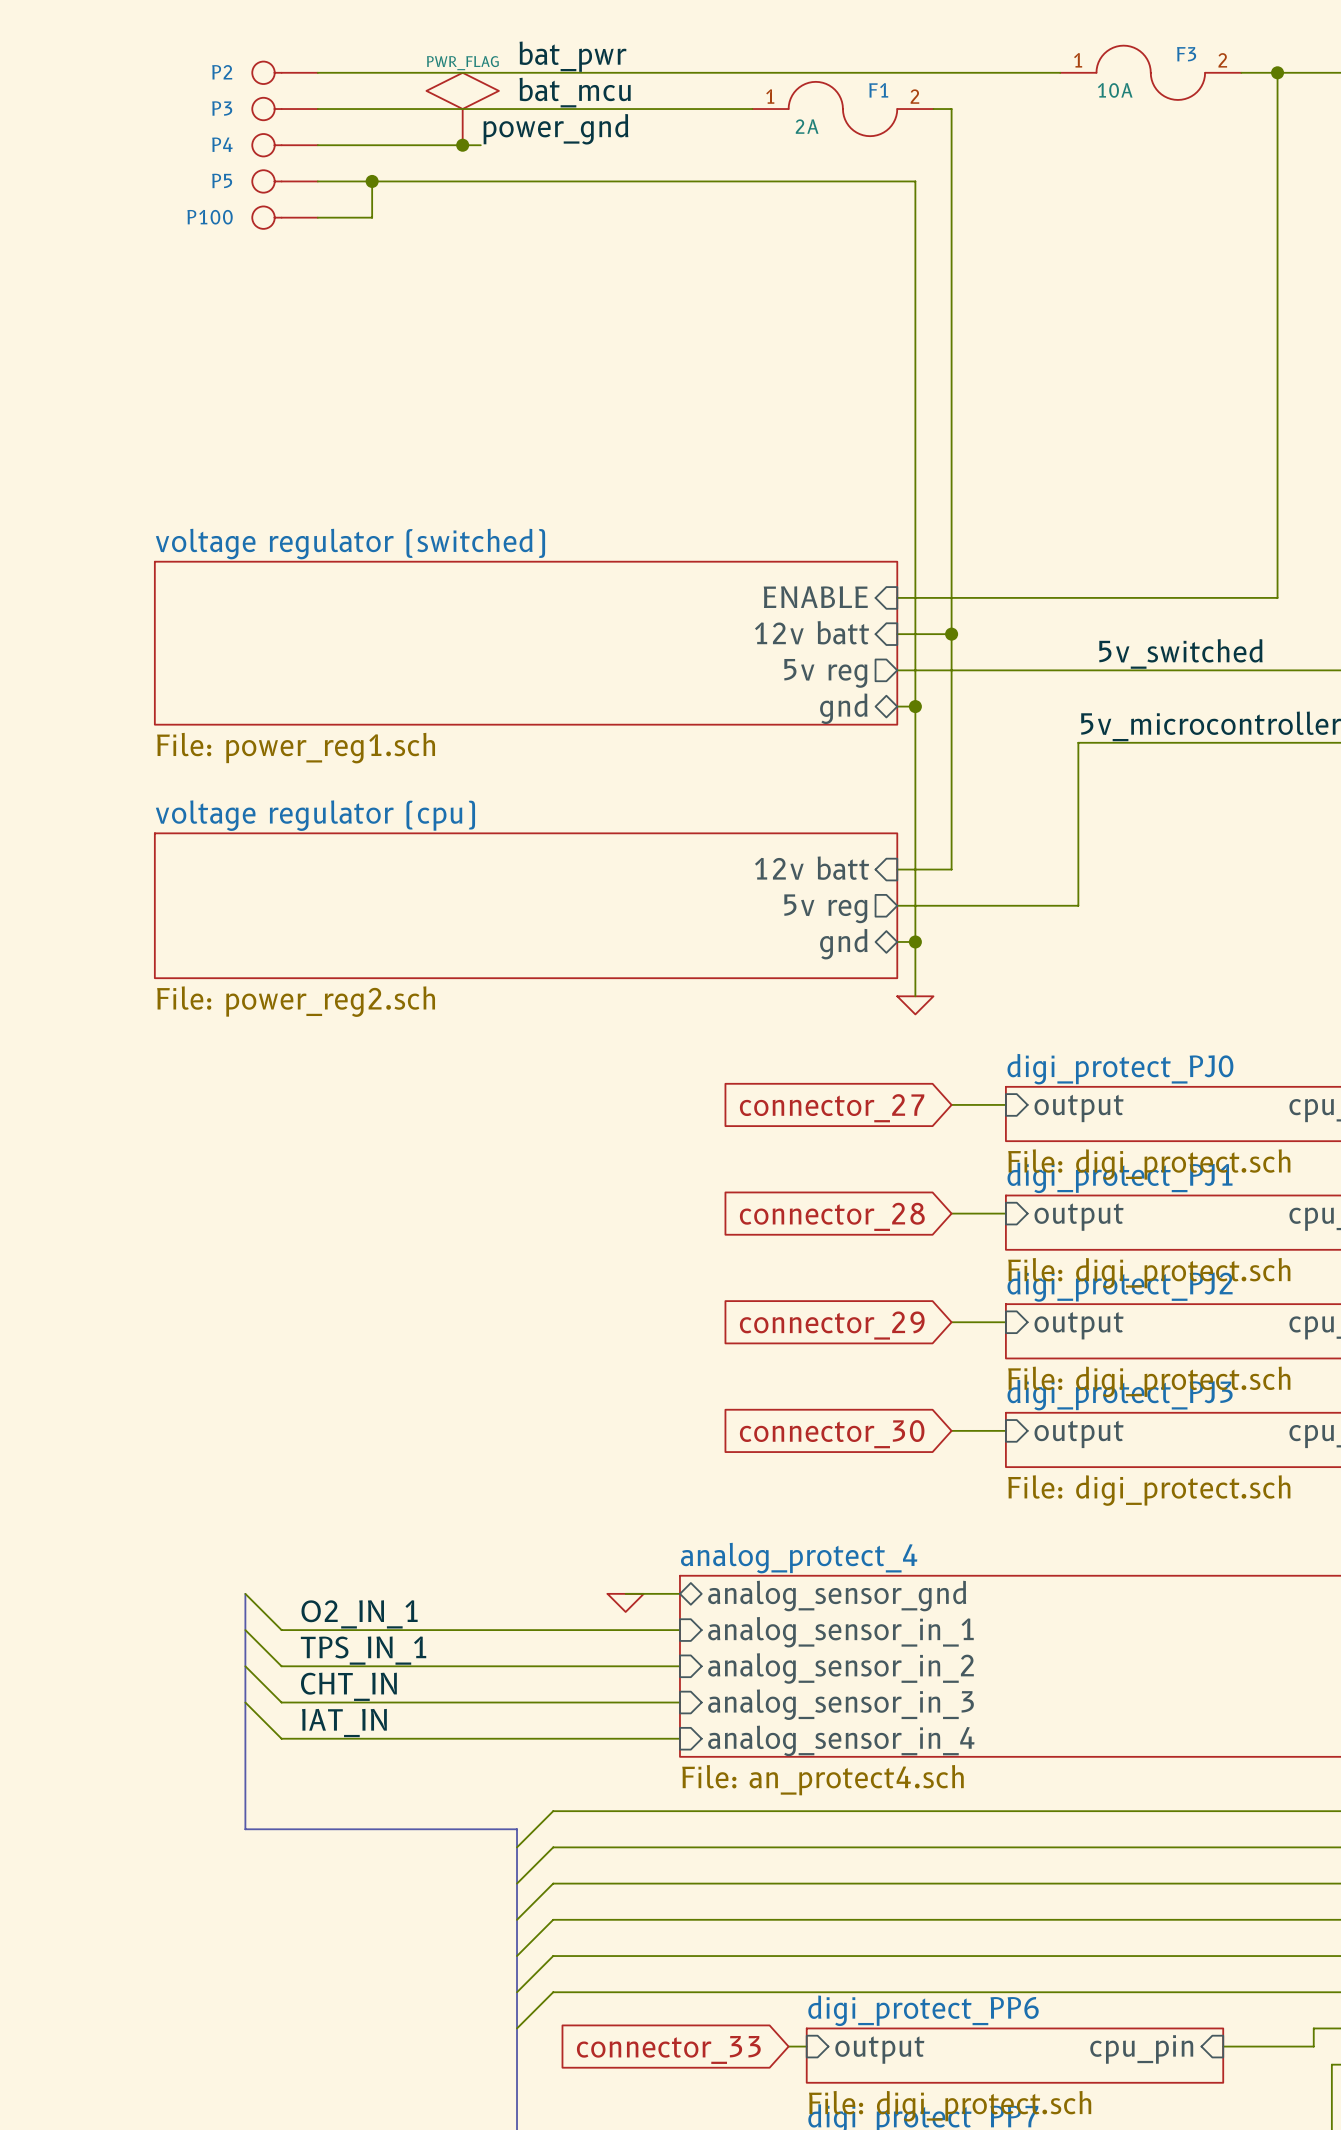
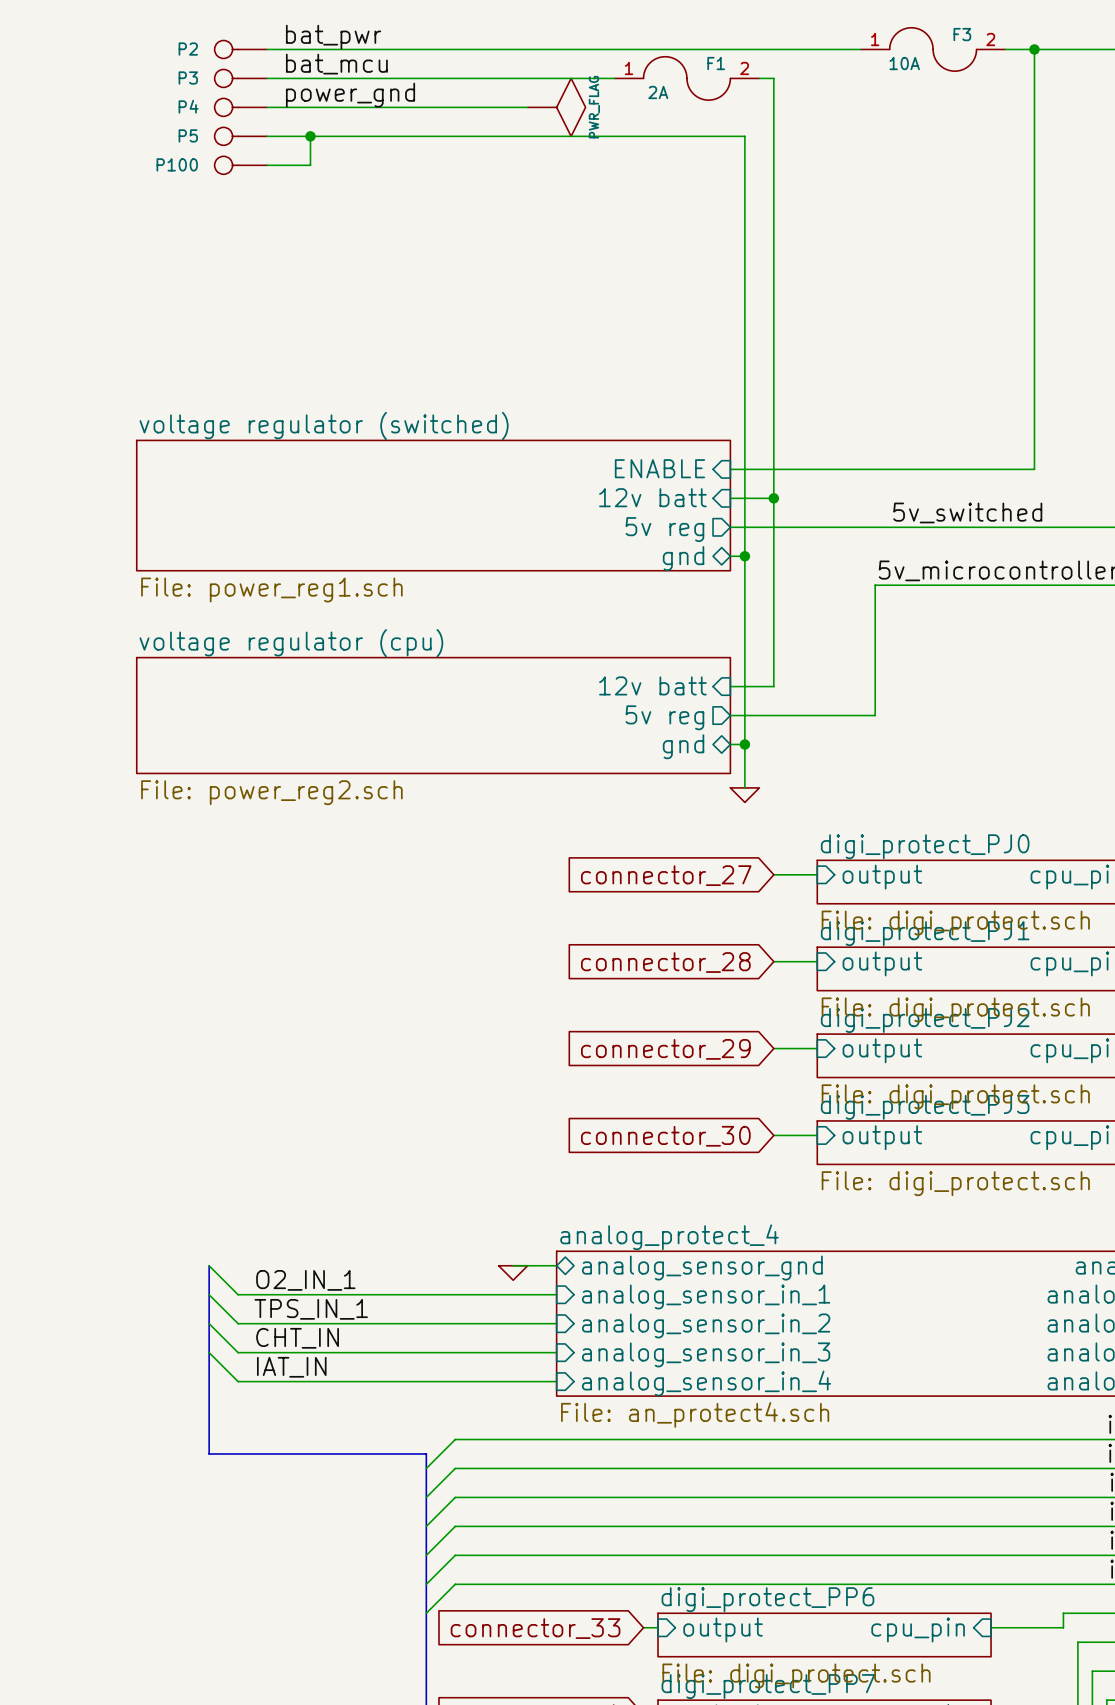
label position: bat_pwr (572, 56) -> bat_pwr (333, 37)
label position: bat_mcu (575, 92) -> bat_mcu (336, 64)
power symbol rotation: 0° (462, 109) -> 90° clockwise (556, 107)
power symbol position: PWR_FLAG (462, 109) -> PWR_FLAG (556, 107)
label position: power_gnd (555, 129) -> power_gnd (350, 95)
junction: (462, 145) -> none
wire: none -> (397, 107) (527, 107)

